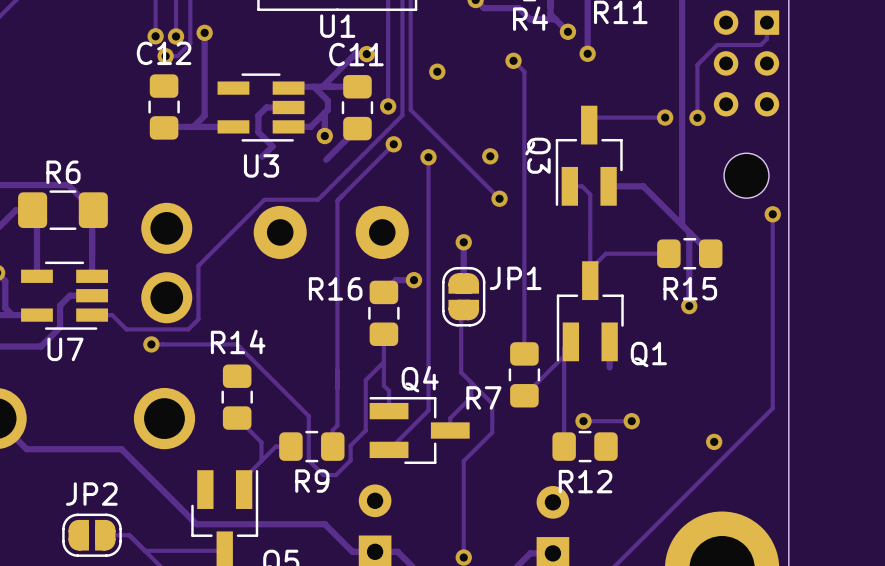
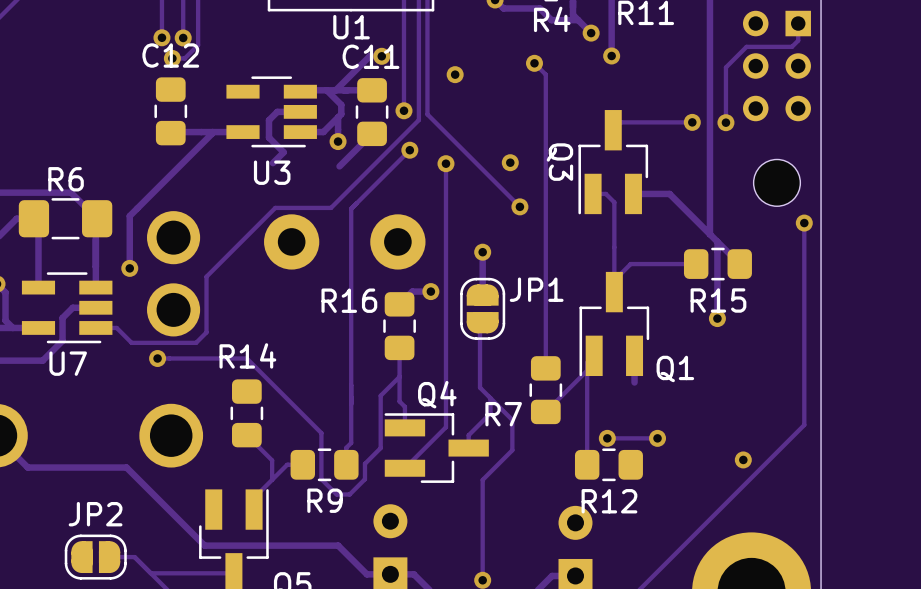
track: (204, 32) (204, 115) (193, 126) -> none
via: (204, 32) -> none
track: none -> (212, 132) (129, 216) (129, 268)
via: none -> (129, 268)

